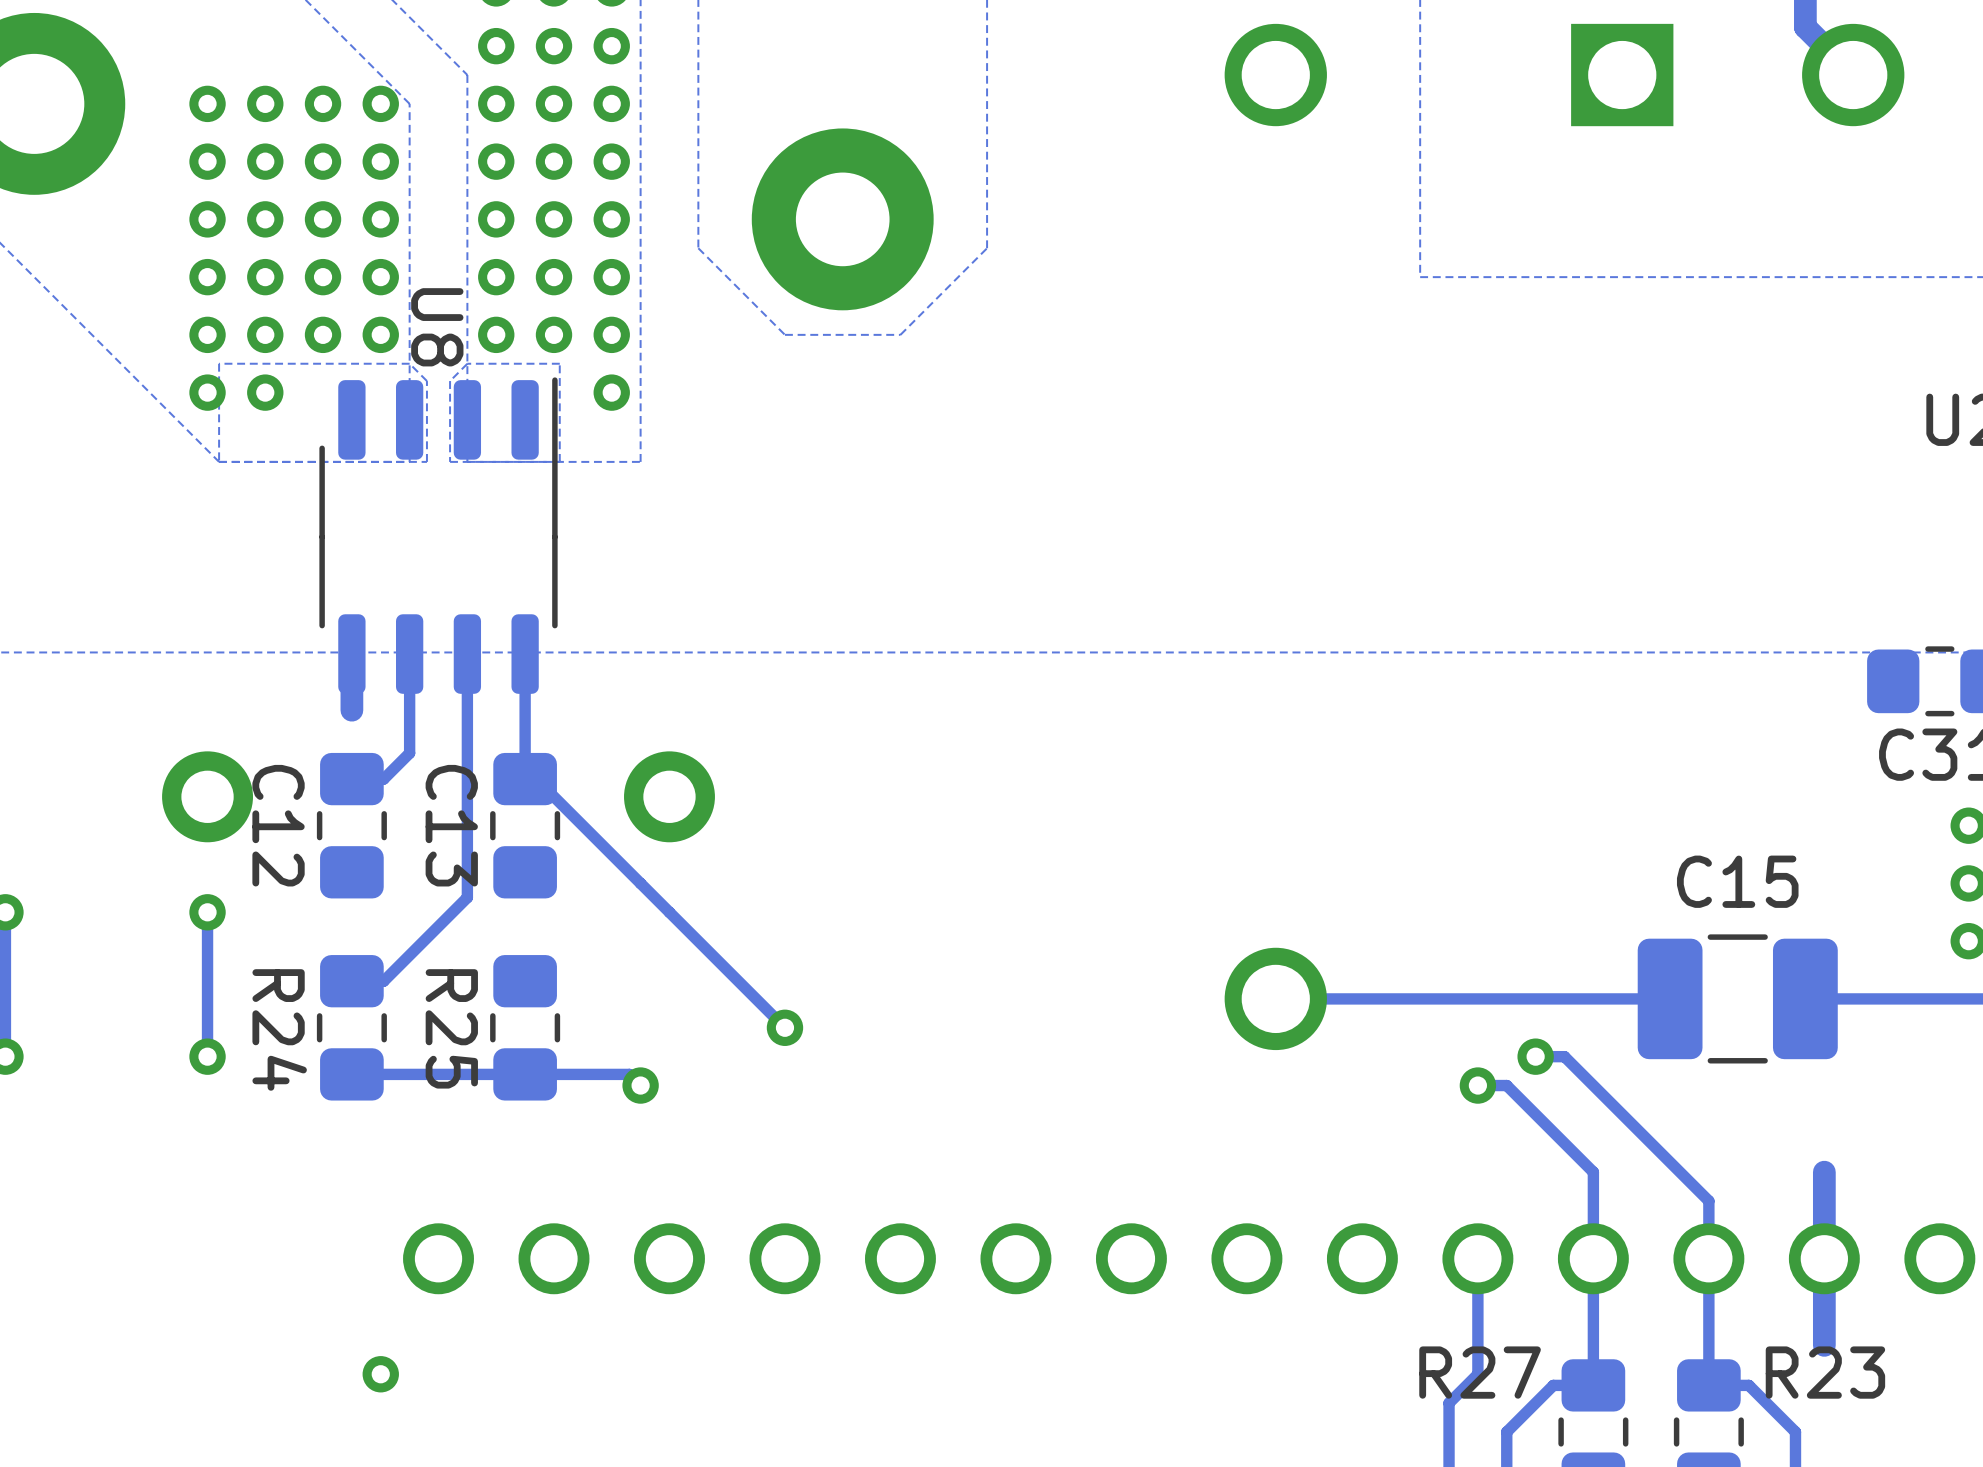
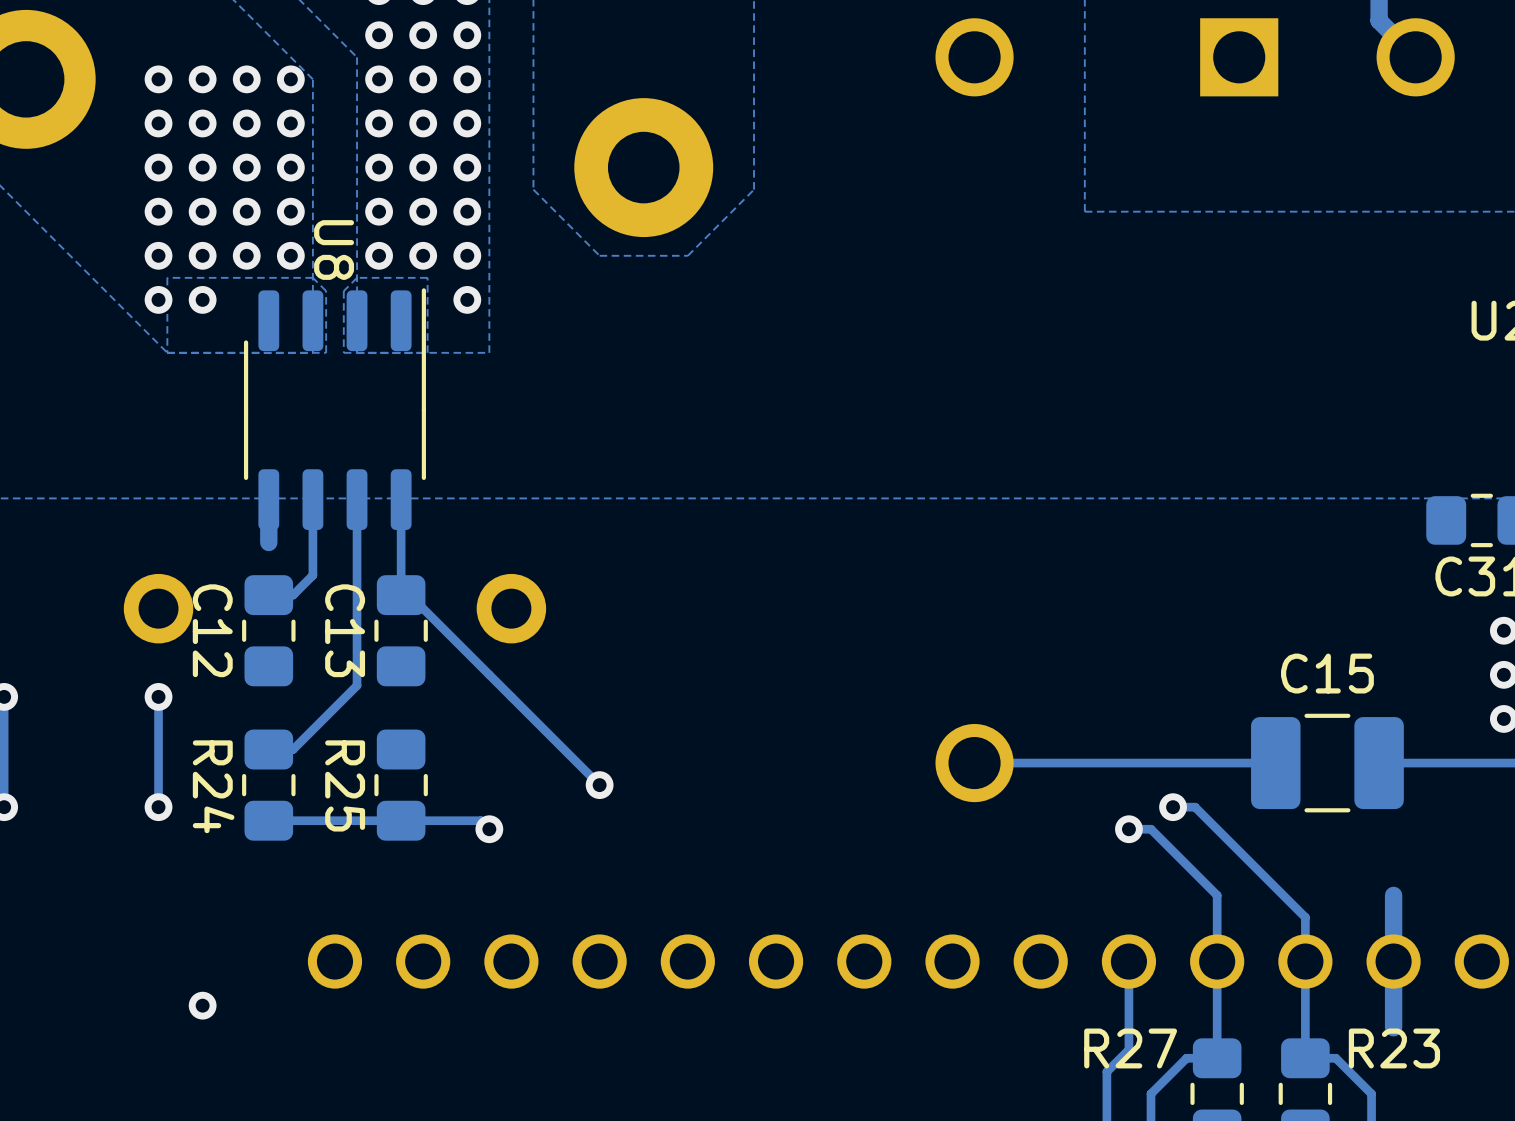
via: none -> (202, 1005)
via: (380, 1374) -> none

